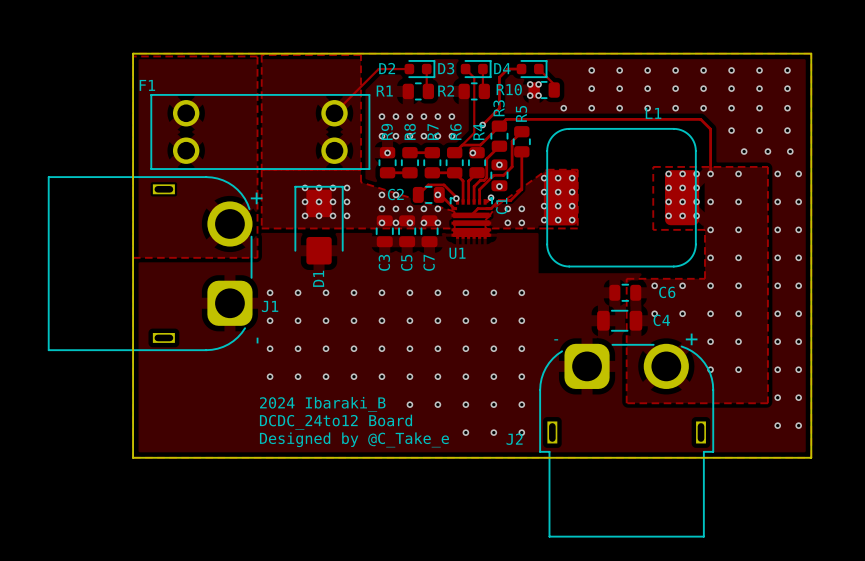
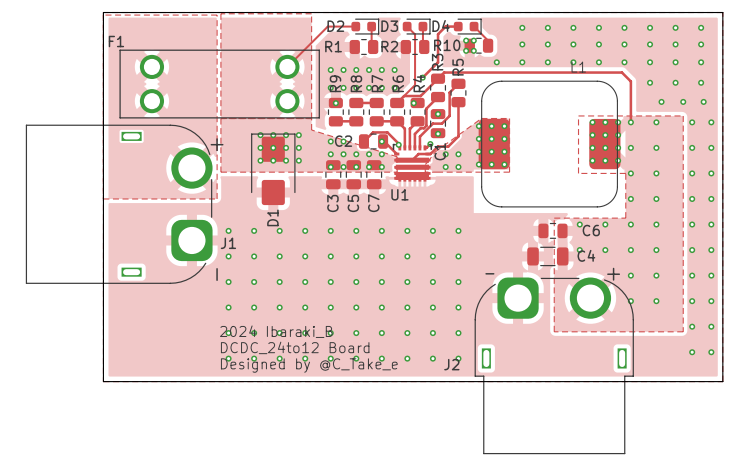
via: none -> (228, 333)
via: none -> (254, 333)
via: none -> (279, 333)
via: none -> (305, 333)
via: none -> (330, 333)
via: none -> (228, 358)
via: none -> (254, 358)
via: none -> (279, 358)
via: none -> (305, 358)
via: none -> (330, 358)
via: none -> (356, 358)
via: none -> (381, 358)

